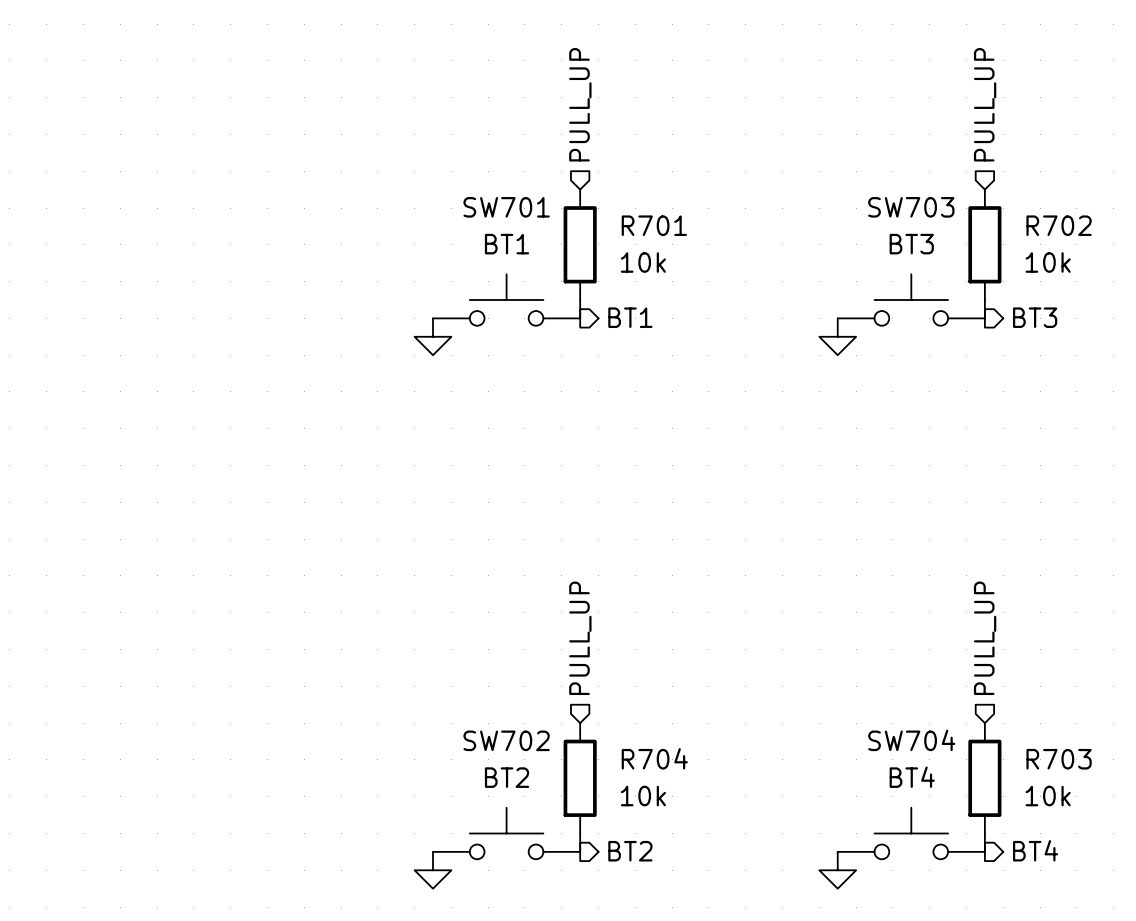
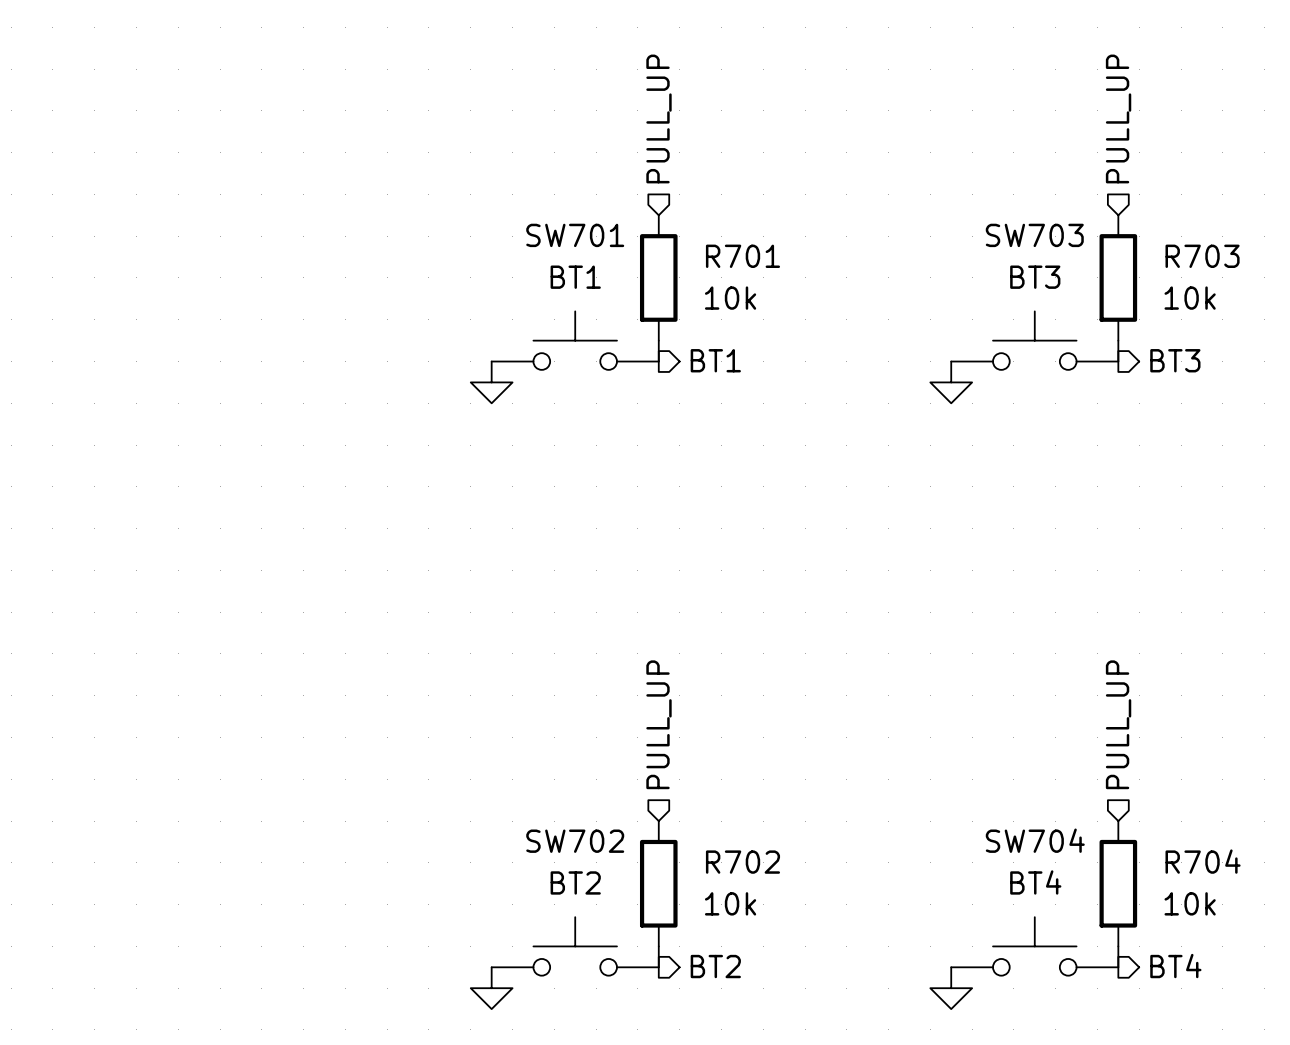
R702 name: R702 (1059, 225) -> R703 (1202, 256)
R704 name: R704 (654, 758) -> R702 (742, 862)
R703 name: R703 (1059, 759) -> R704 (1203, 861)

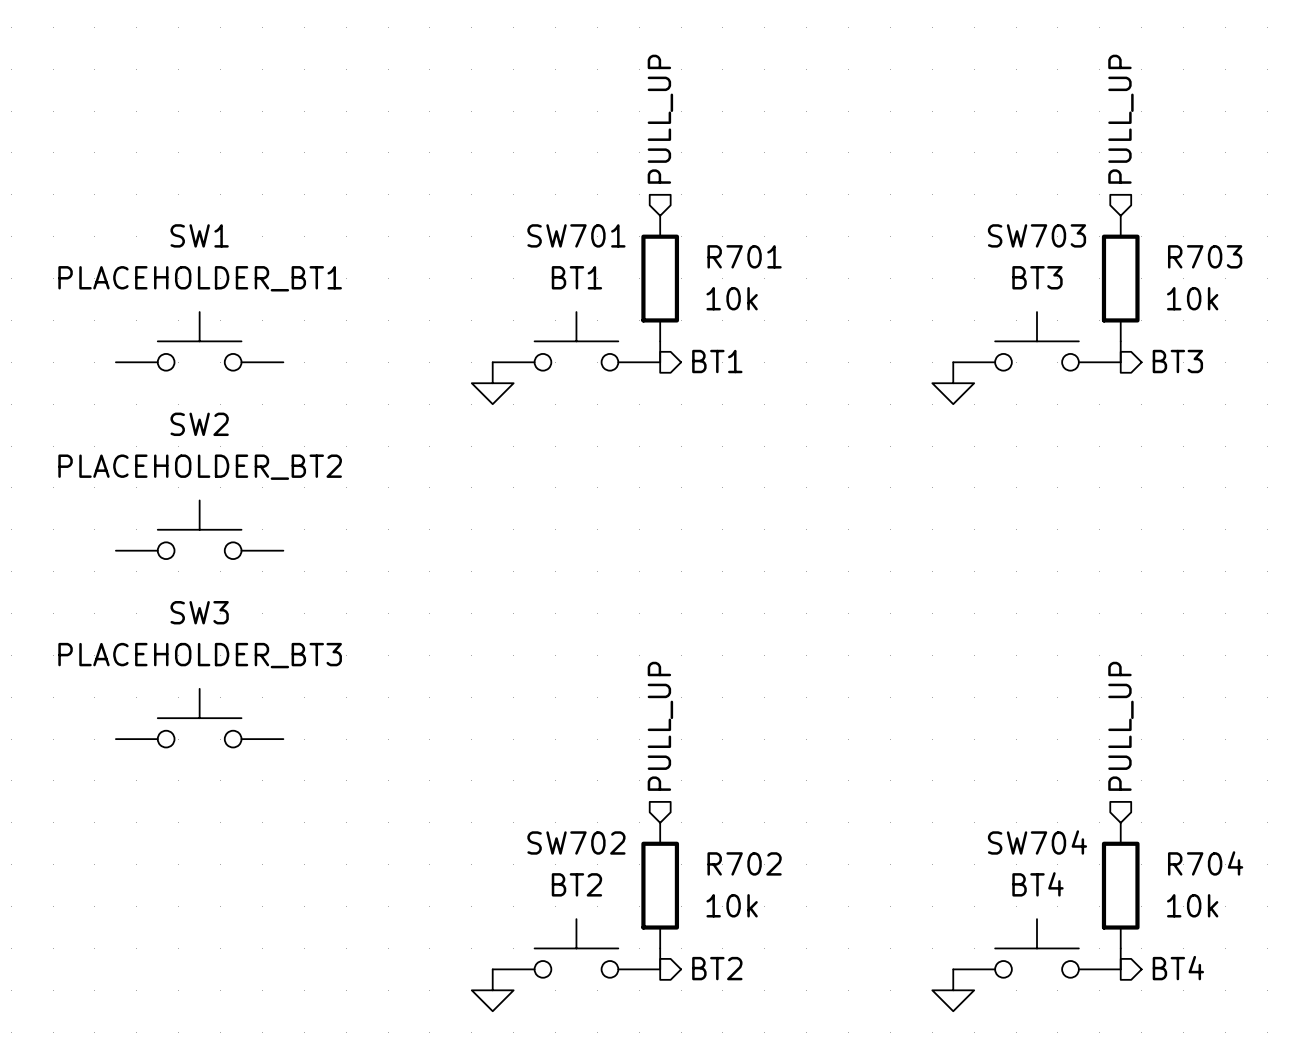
SW1: none -> PLACEHOLDER_BT1 (199, 341)
SW2: none -> PLACEHOLDER_BT2 (199, 529)
SW3: none -> PLACEHOLDER_BT3 (199, 718)

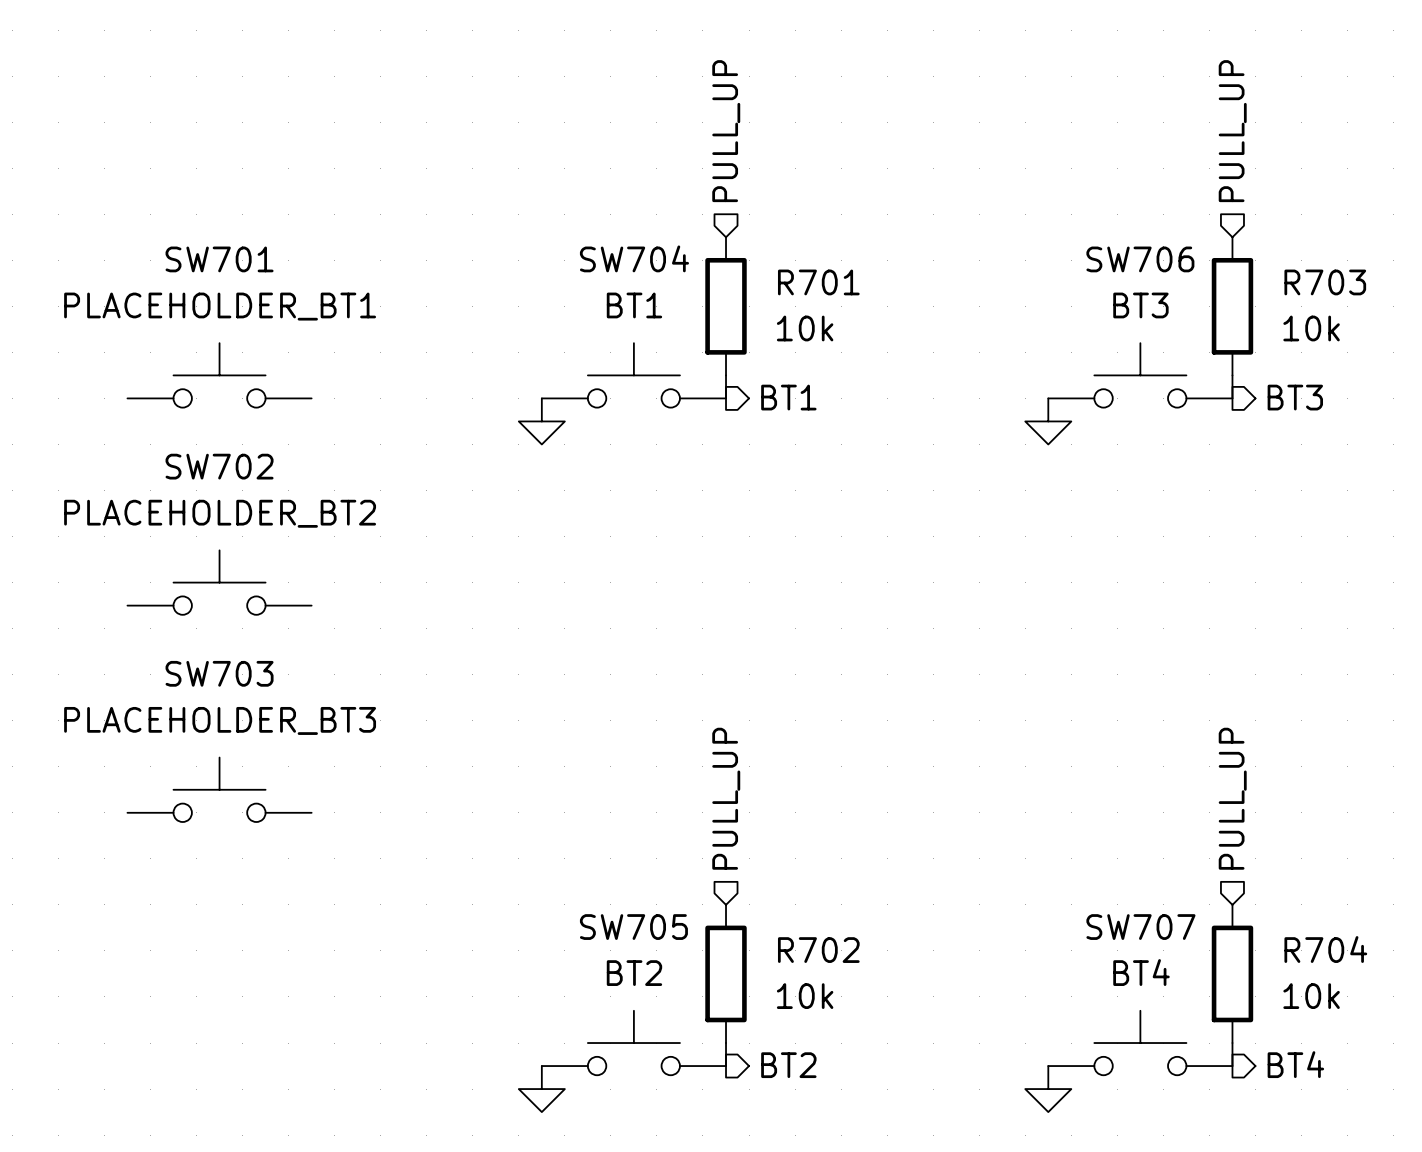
SW1 name: SW1 (199, 235) -> SW701 (219, 259)
SW701 name: SW701 (576, 235) -> SW704 (634, 258)
SW703 name: SW703 (1036, 235) -> SW706 (1140, 259)
SW2 name: SW2 (199, 424) -> SW702 (219, 466)
SW3 name: SW3 (199, 612) -> SW703 (219, 673)
SW702 name: SW702 (576, 842) -> SW705 (633, 927)
SW704 name: SW704 (1037, 842) -> SW707 (1140, 927)

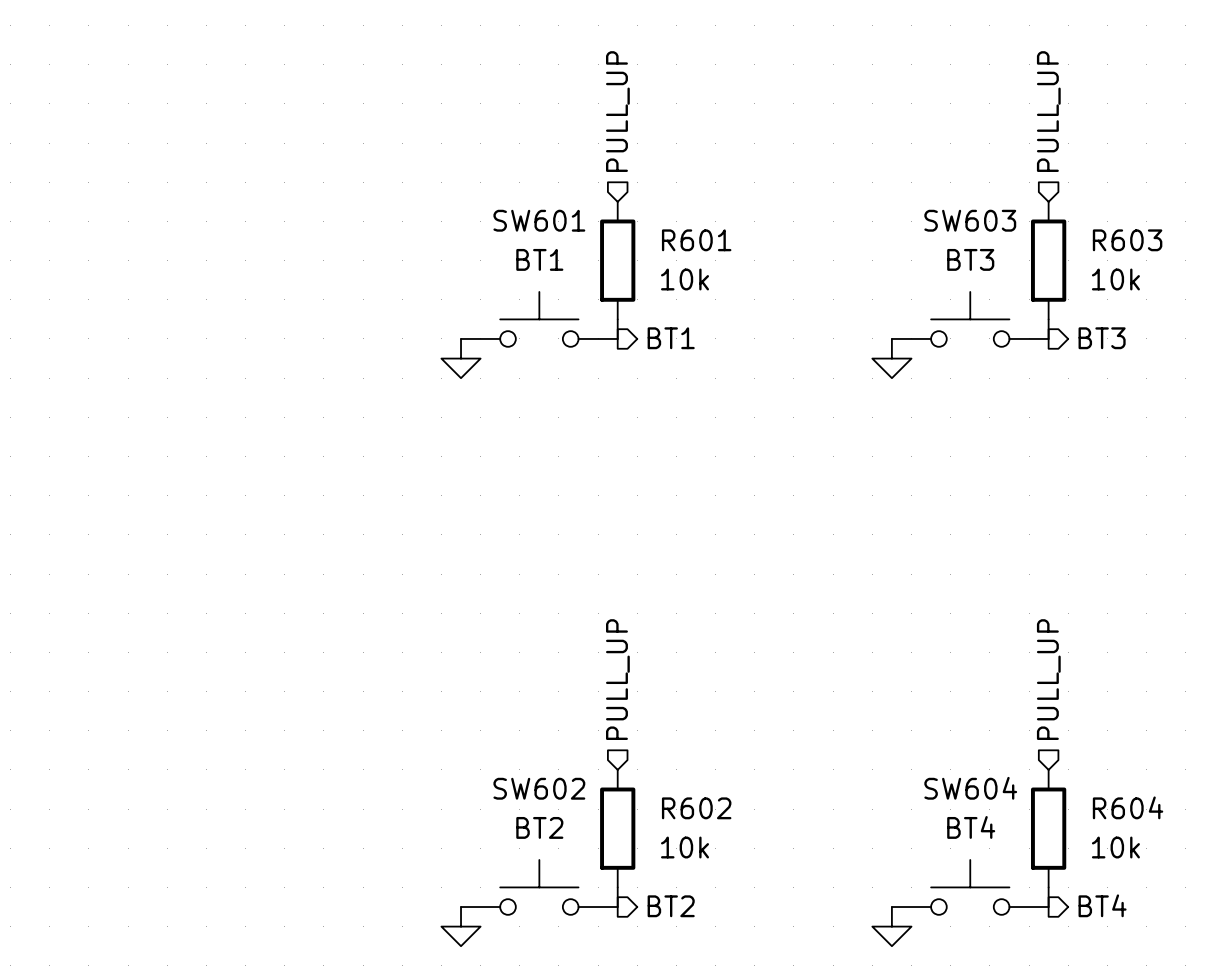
SW704 name: SW704 (634, 258) -> SW601 (539, 220)
SW706 name: SW706 (1140, 259) -> SW603 (970, 220)
R701 name: R701 (818, 282) -> R601 (696, 240)
R703 name: R703 (1325, 282) -> R603 (1127, 240)
SW701: PLACEHOLDER_BT1 (219, 375) -> none
SW702: PLACEHOLDER_BT2 (219, 582) -> none
SW703: PLACEHOLDER_BT3 (219, 789) -> none
SW705 name: SW705 (633, 927) -> SW602 (539, 788)
SW707 name: SW707 (1140, 927) -> SW604 (970, 788)
R704 name: R704 (1325, 949) -> R604 (1128, 807)
R702 name: R702 (818, 950) -> R602 (696, 808)

